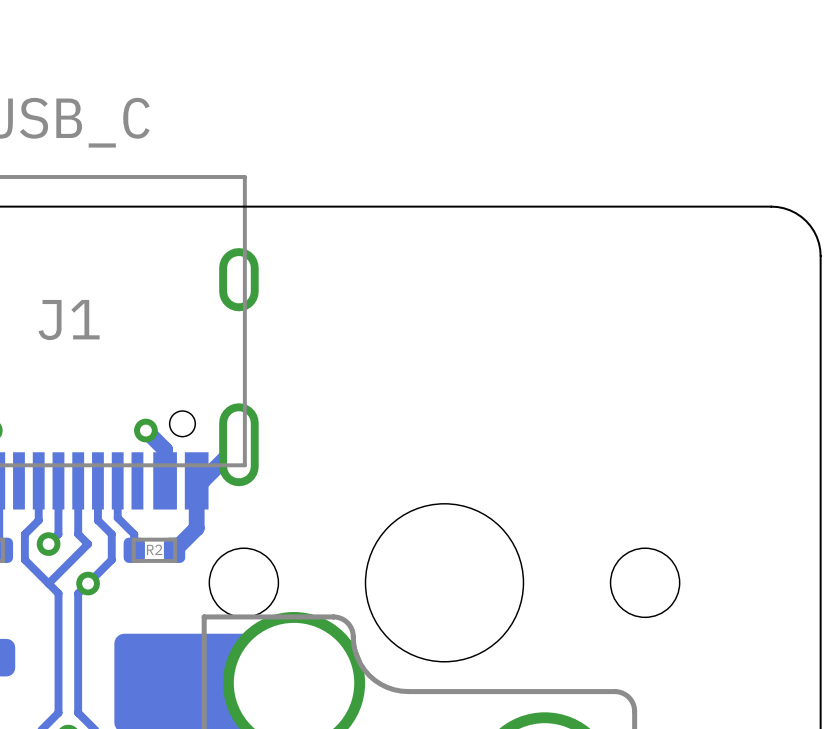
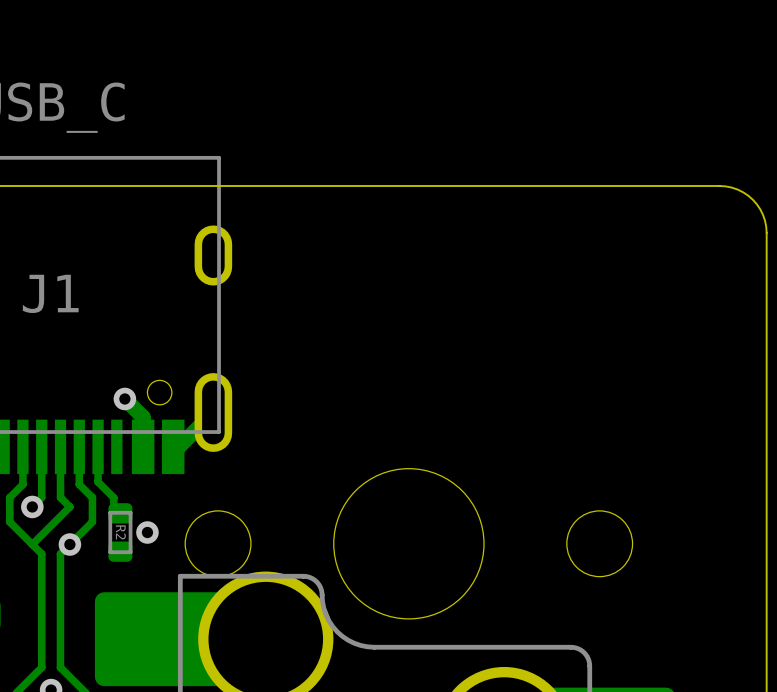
track: (196, 480) (196, 528) (174, 550) -> none
R2 rotation: 0° (154, 550) -> 90° clockwise (120, 532)
via: none -> (147, 532)

